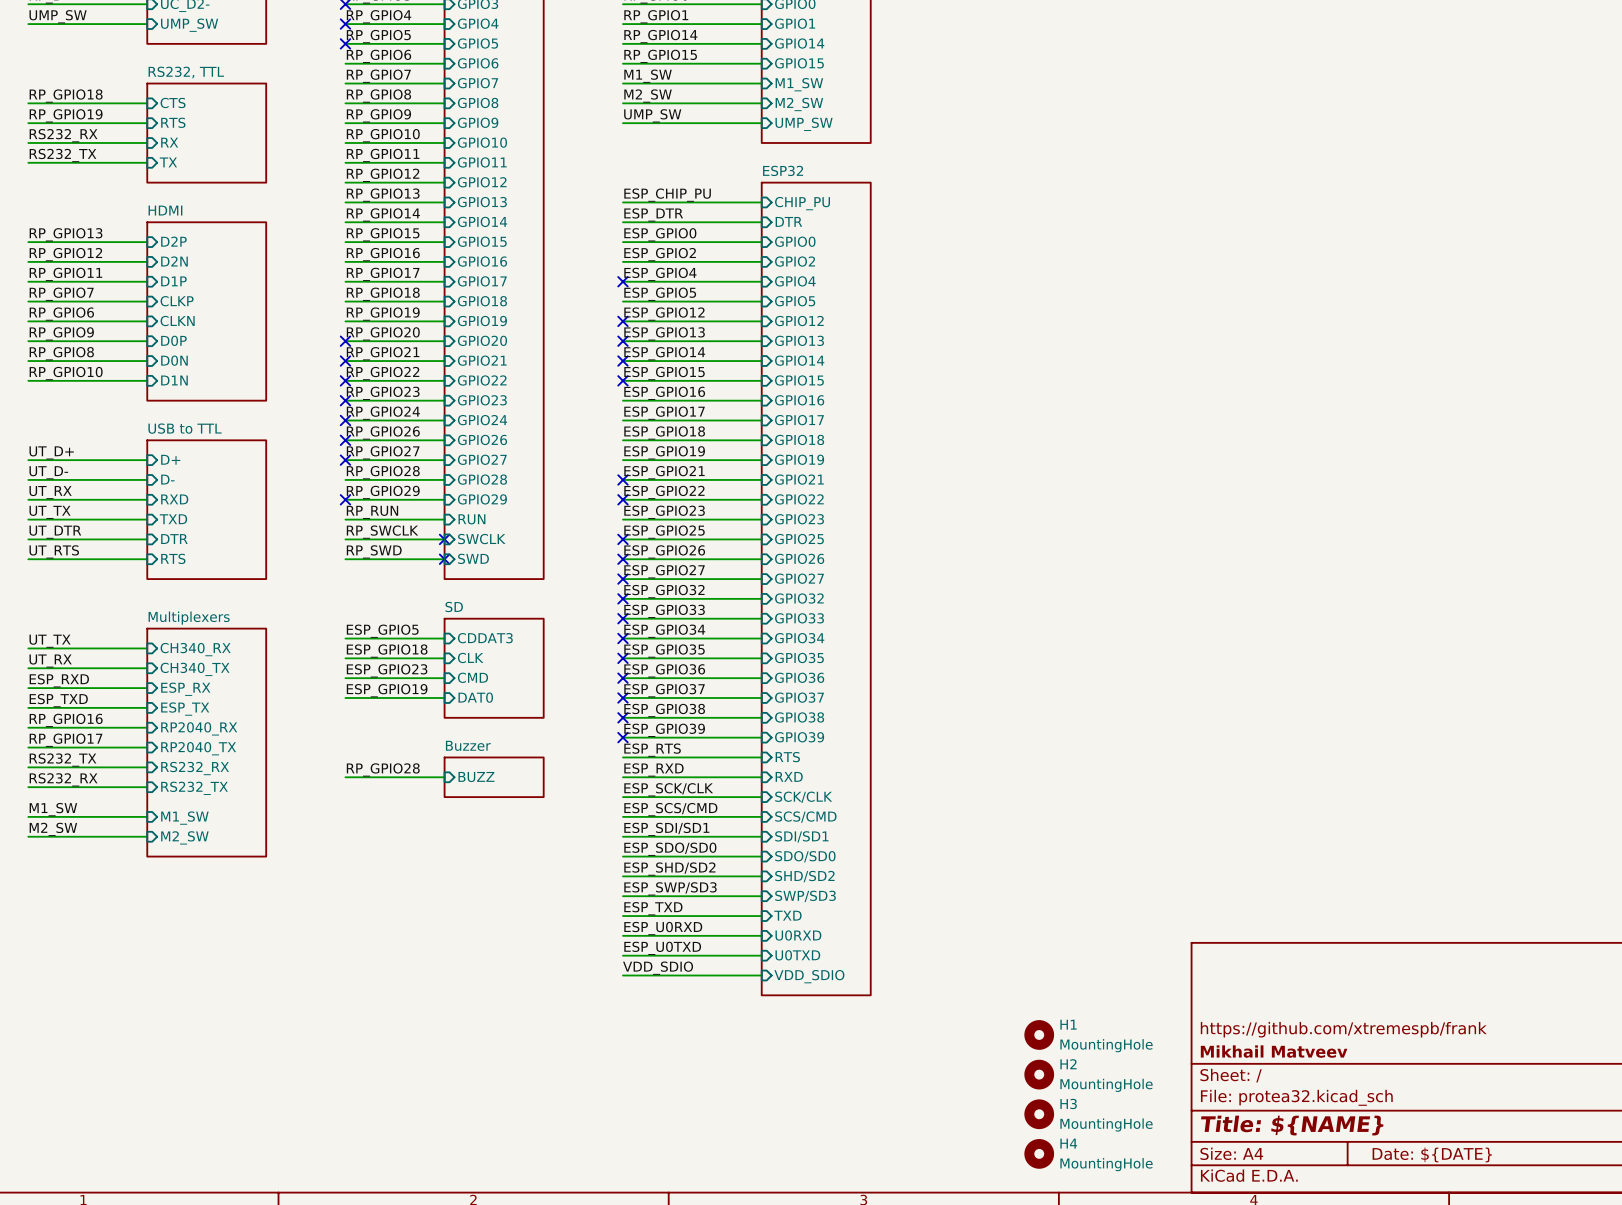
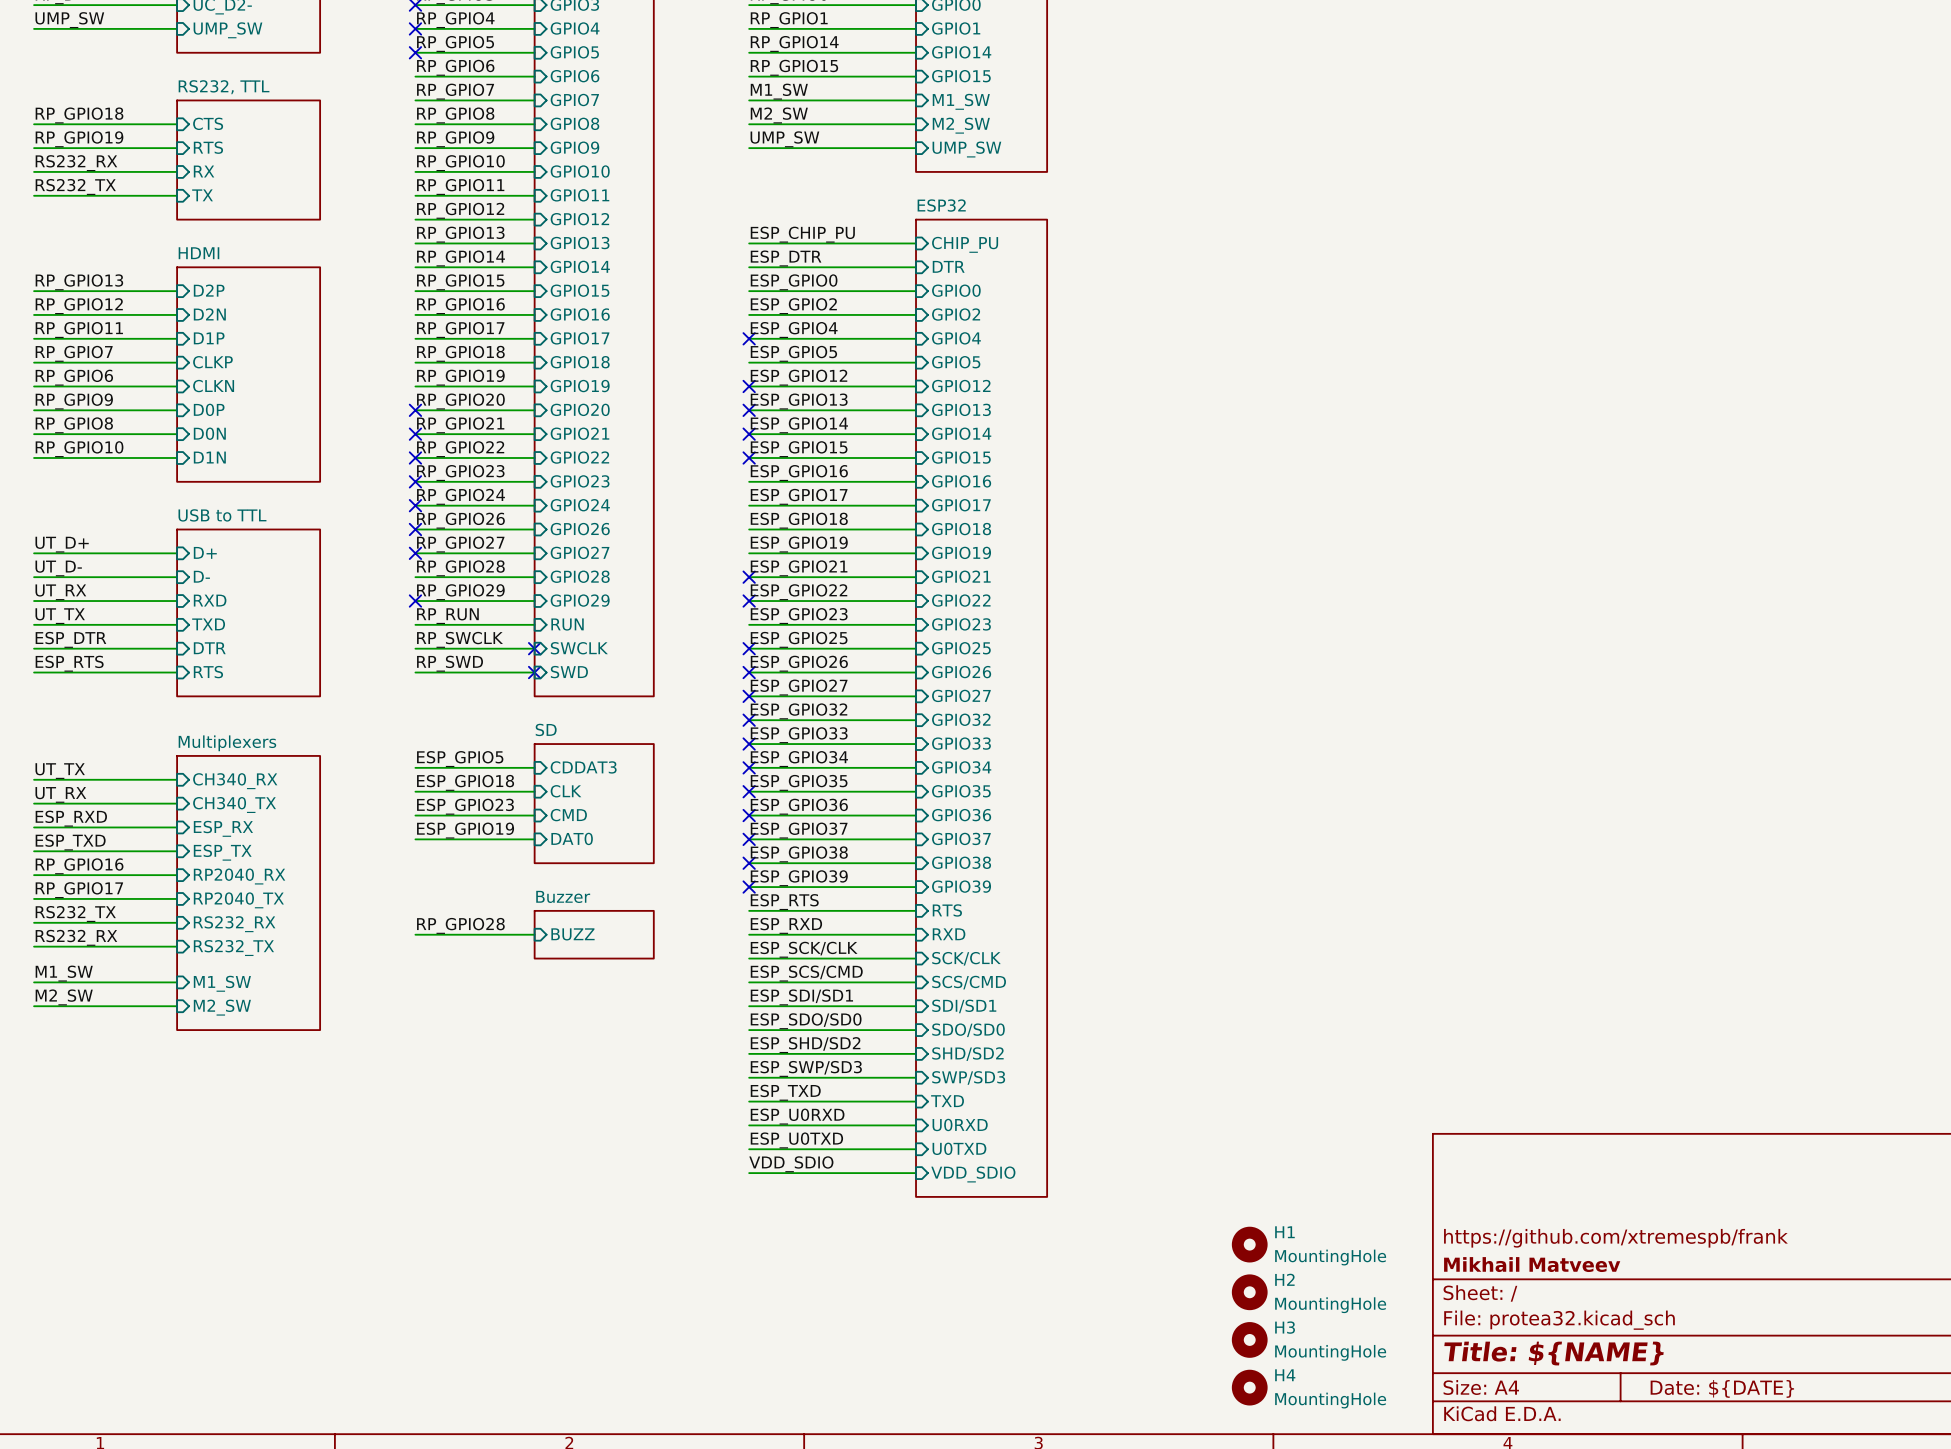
label: UT_DTR (55, 532) -> ESP_DTR (70, 639)
label: UT_RTS (54, 551) -> ESP_RTS (69, 663)

